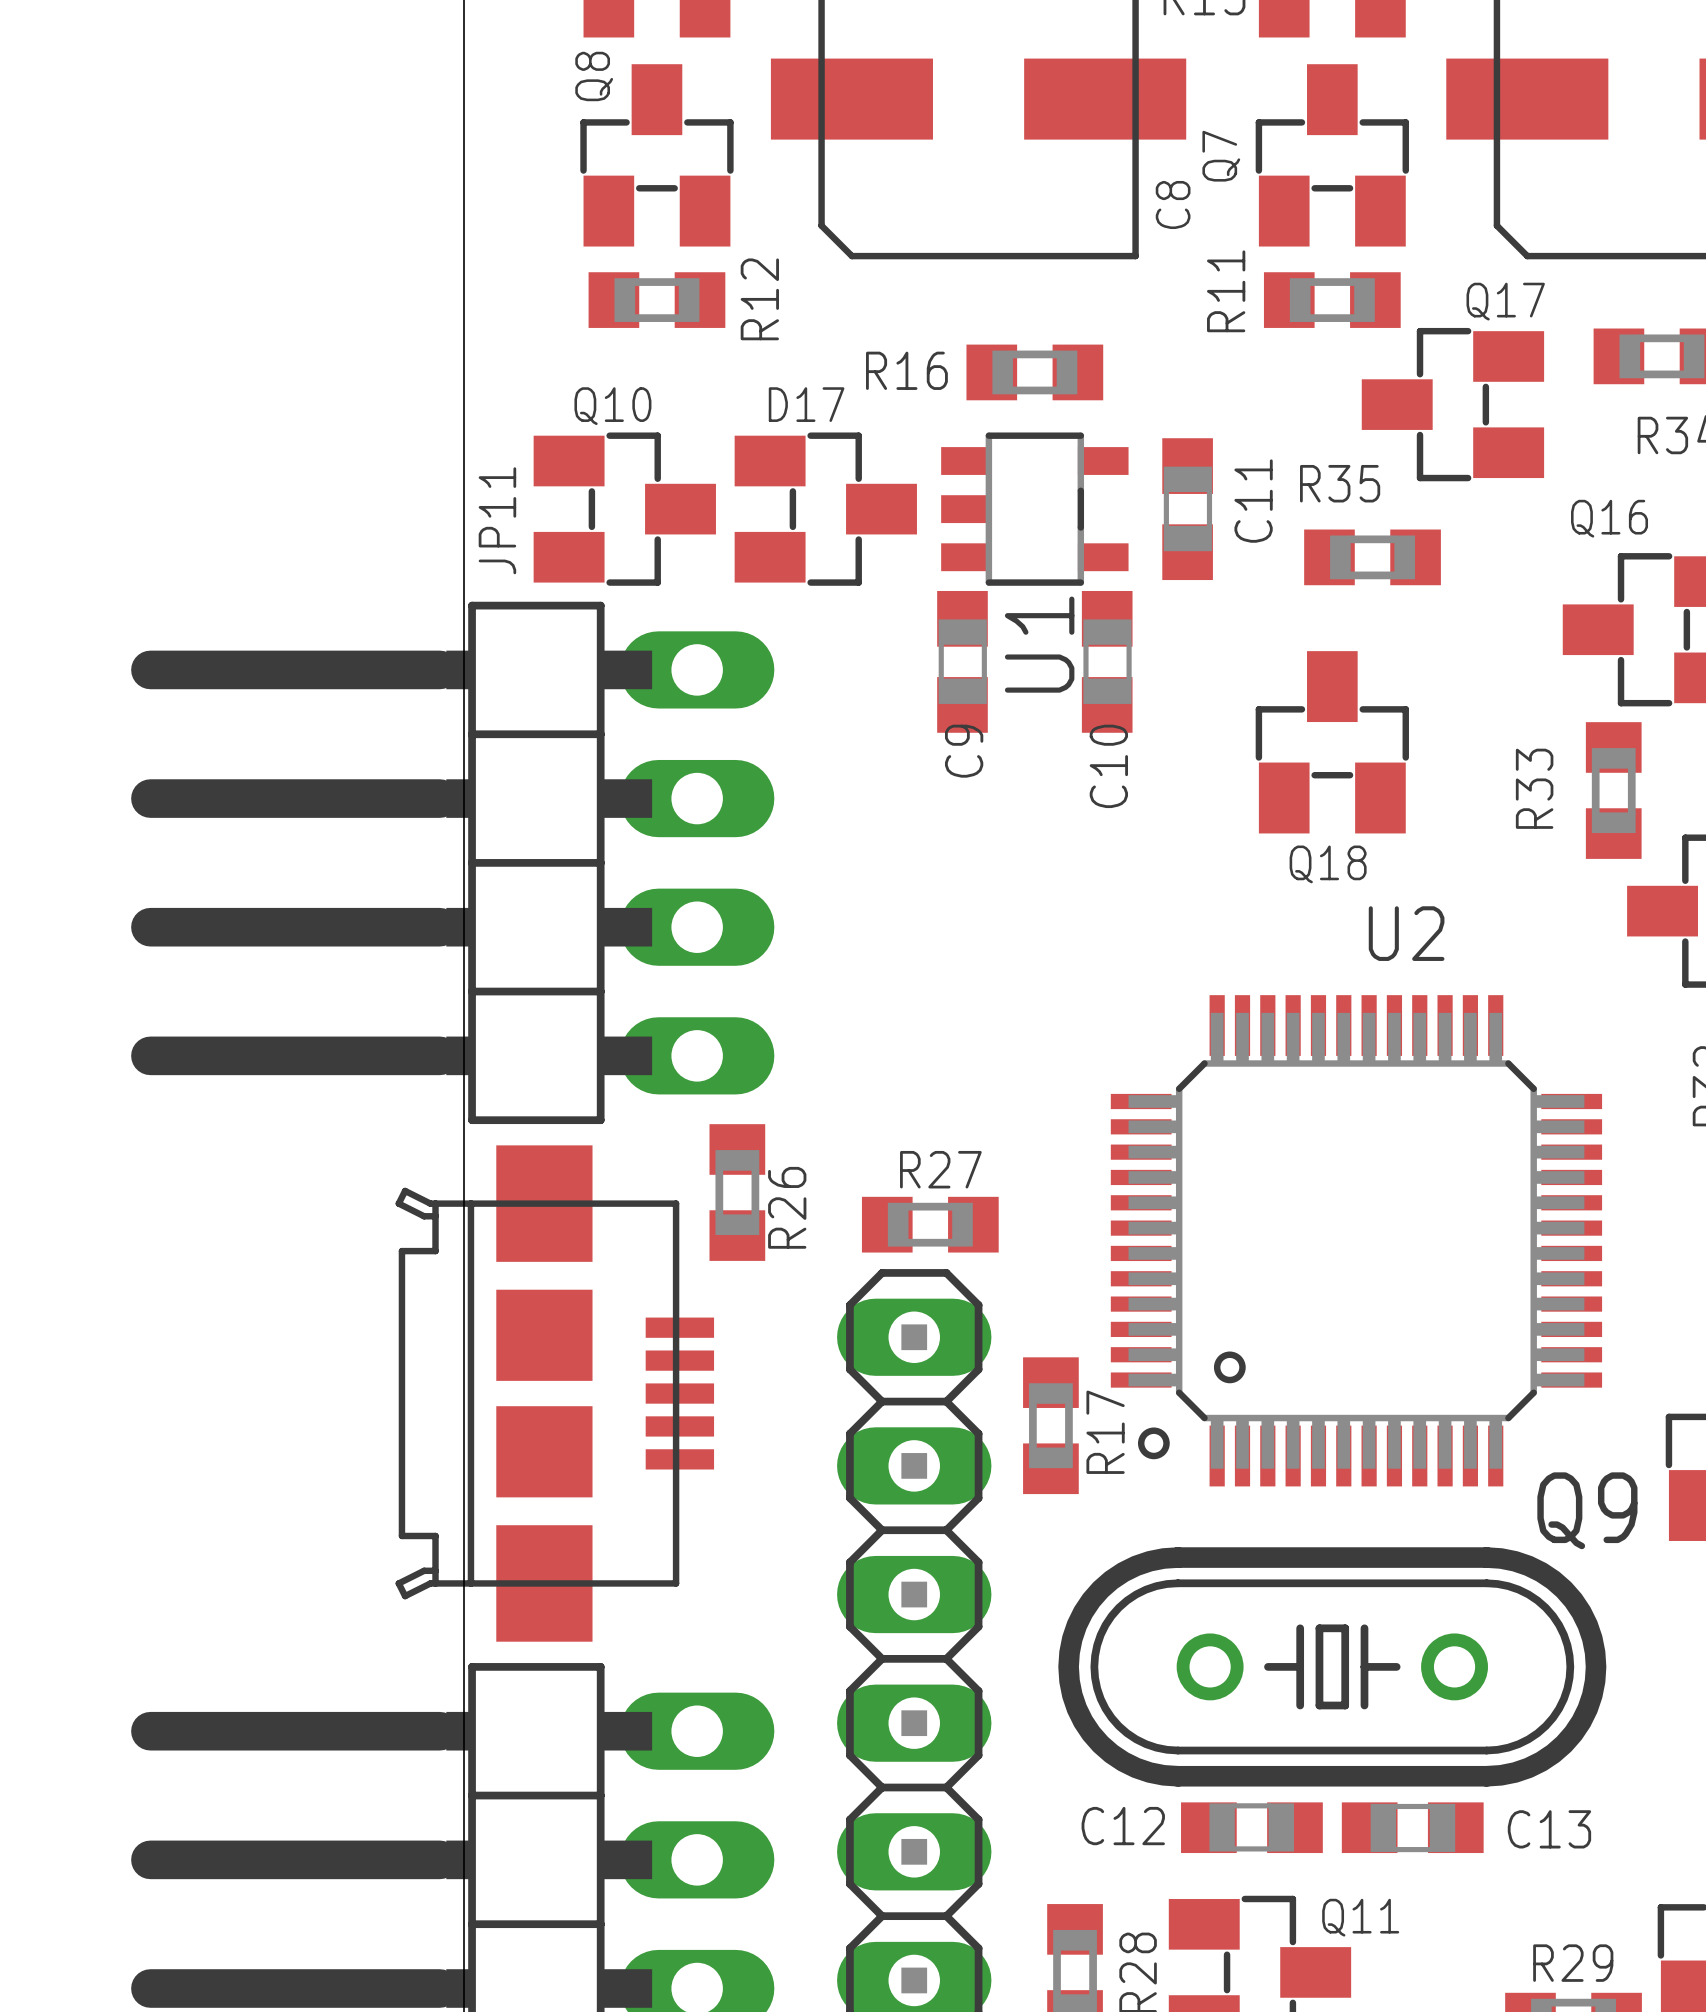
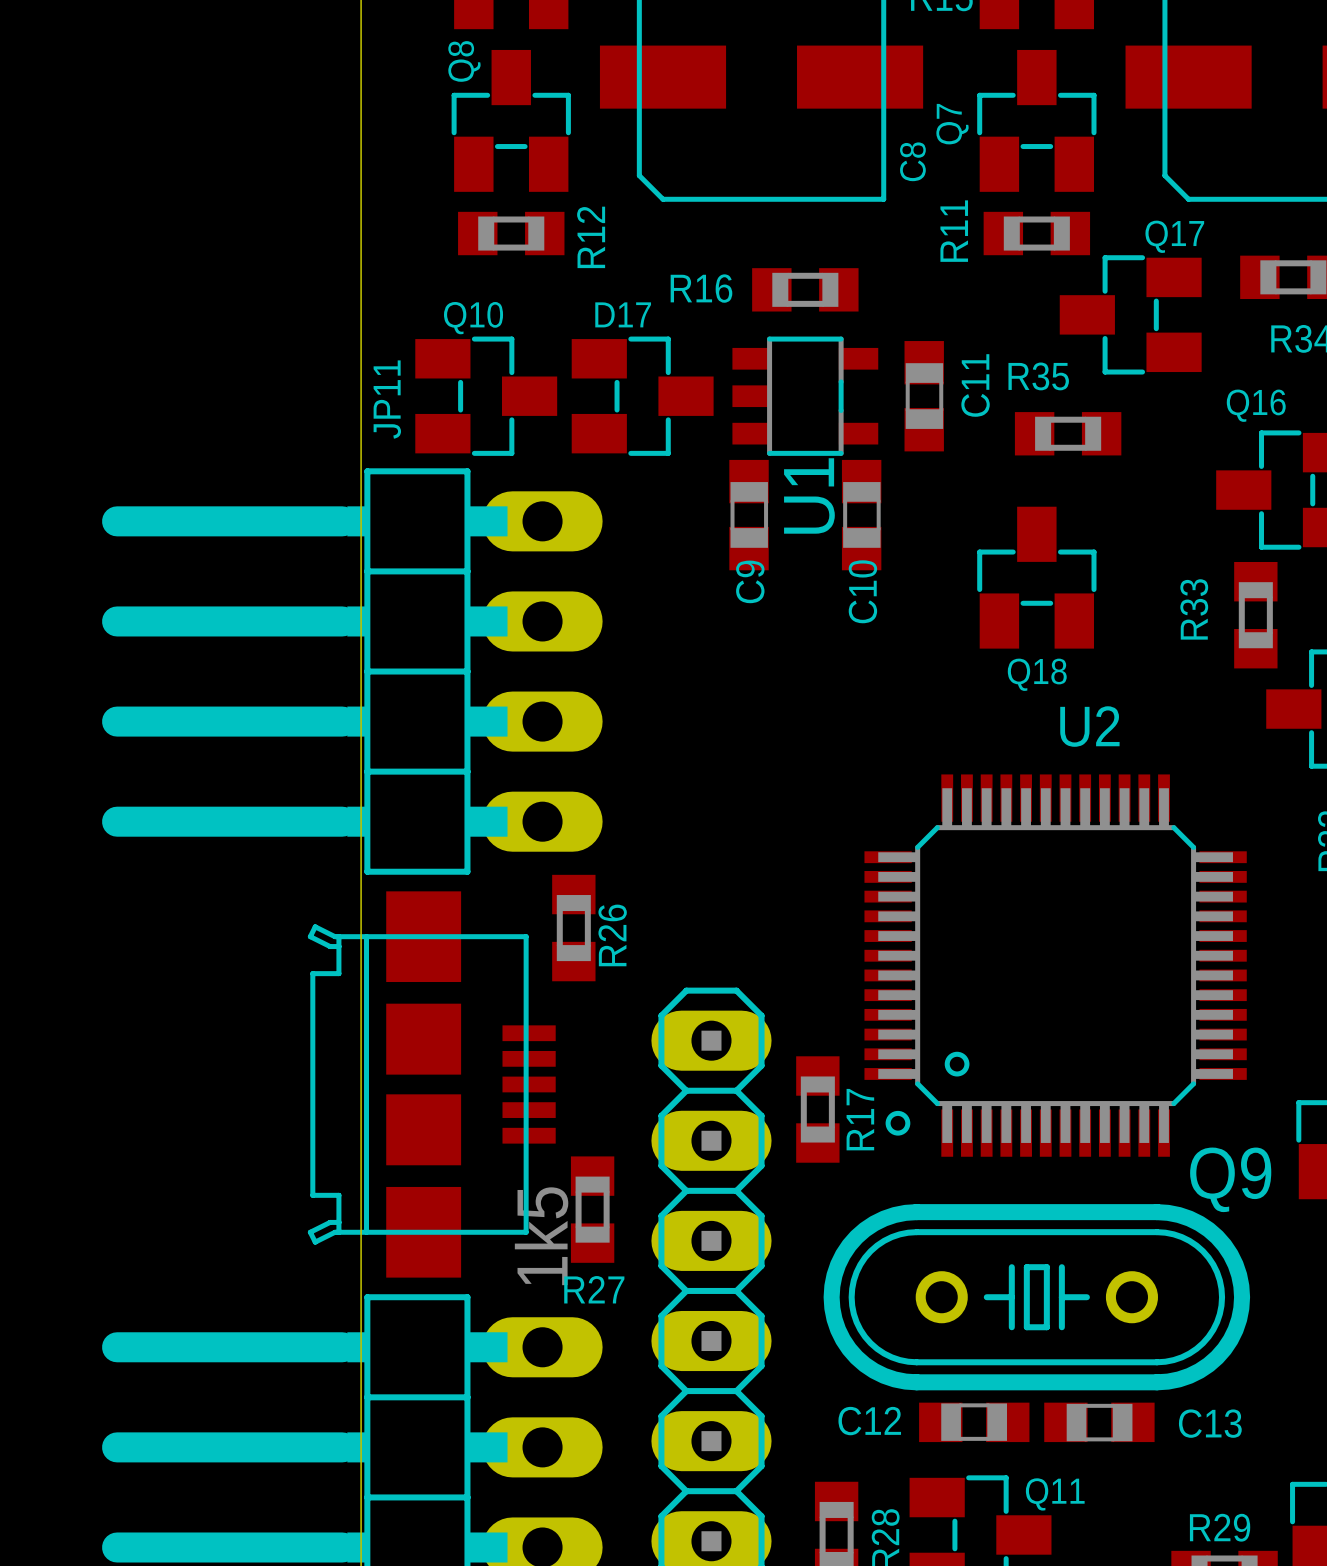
R27 name position: R27 (940, 1169) -> R27 (594, 1289)
R27 rotation: 0° (930, 1224) -> 90° clockwise (592, 1209)
R27 position: (930, 1224) -> (592, 1209)
R27 value: none -> 1k5 (541, 1236)

